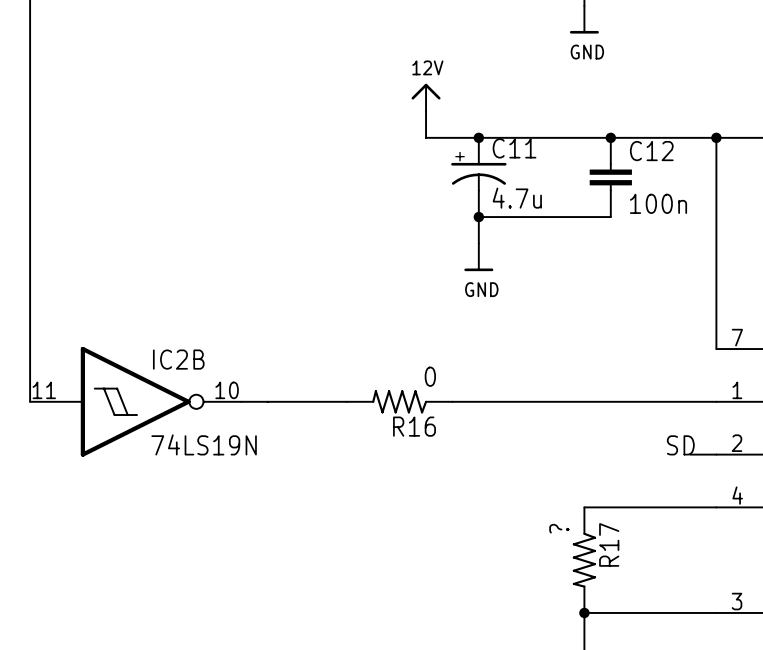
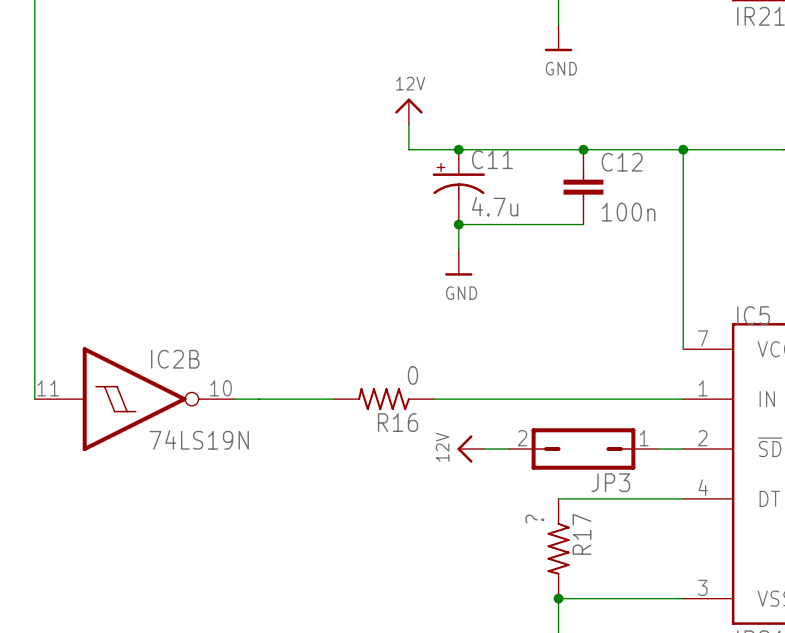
label: SD (680, 445) -> none
power symbol: none -> 12V (470, 449)
wire: none -> (483, 449) (508, 449)
JP3: none -> (583, 449)

